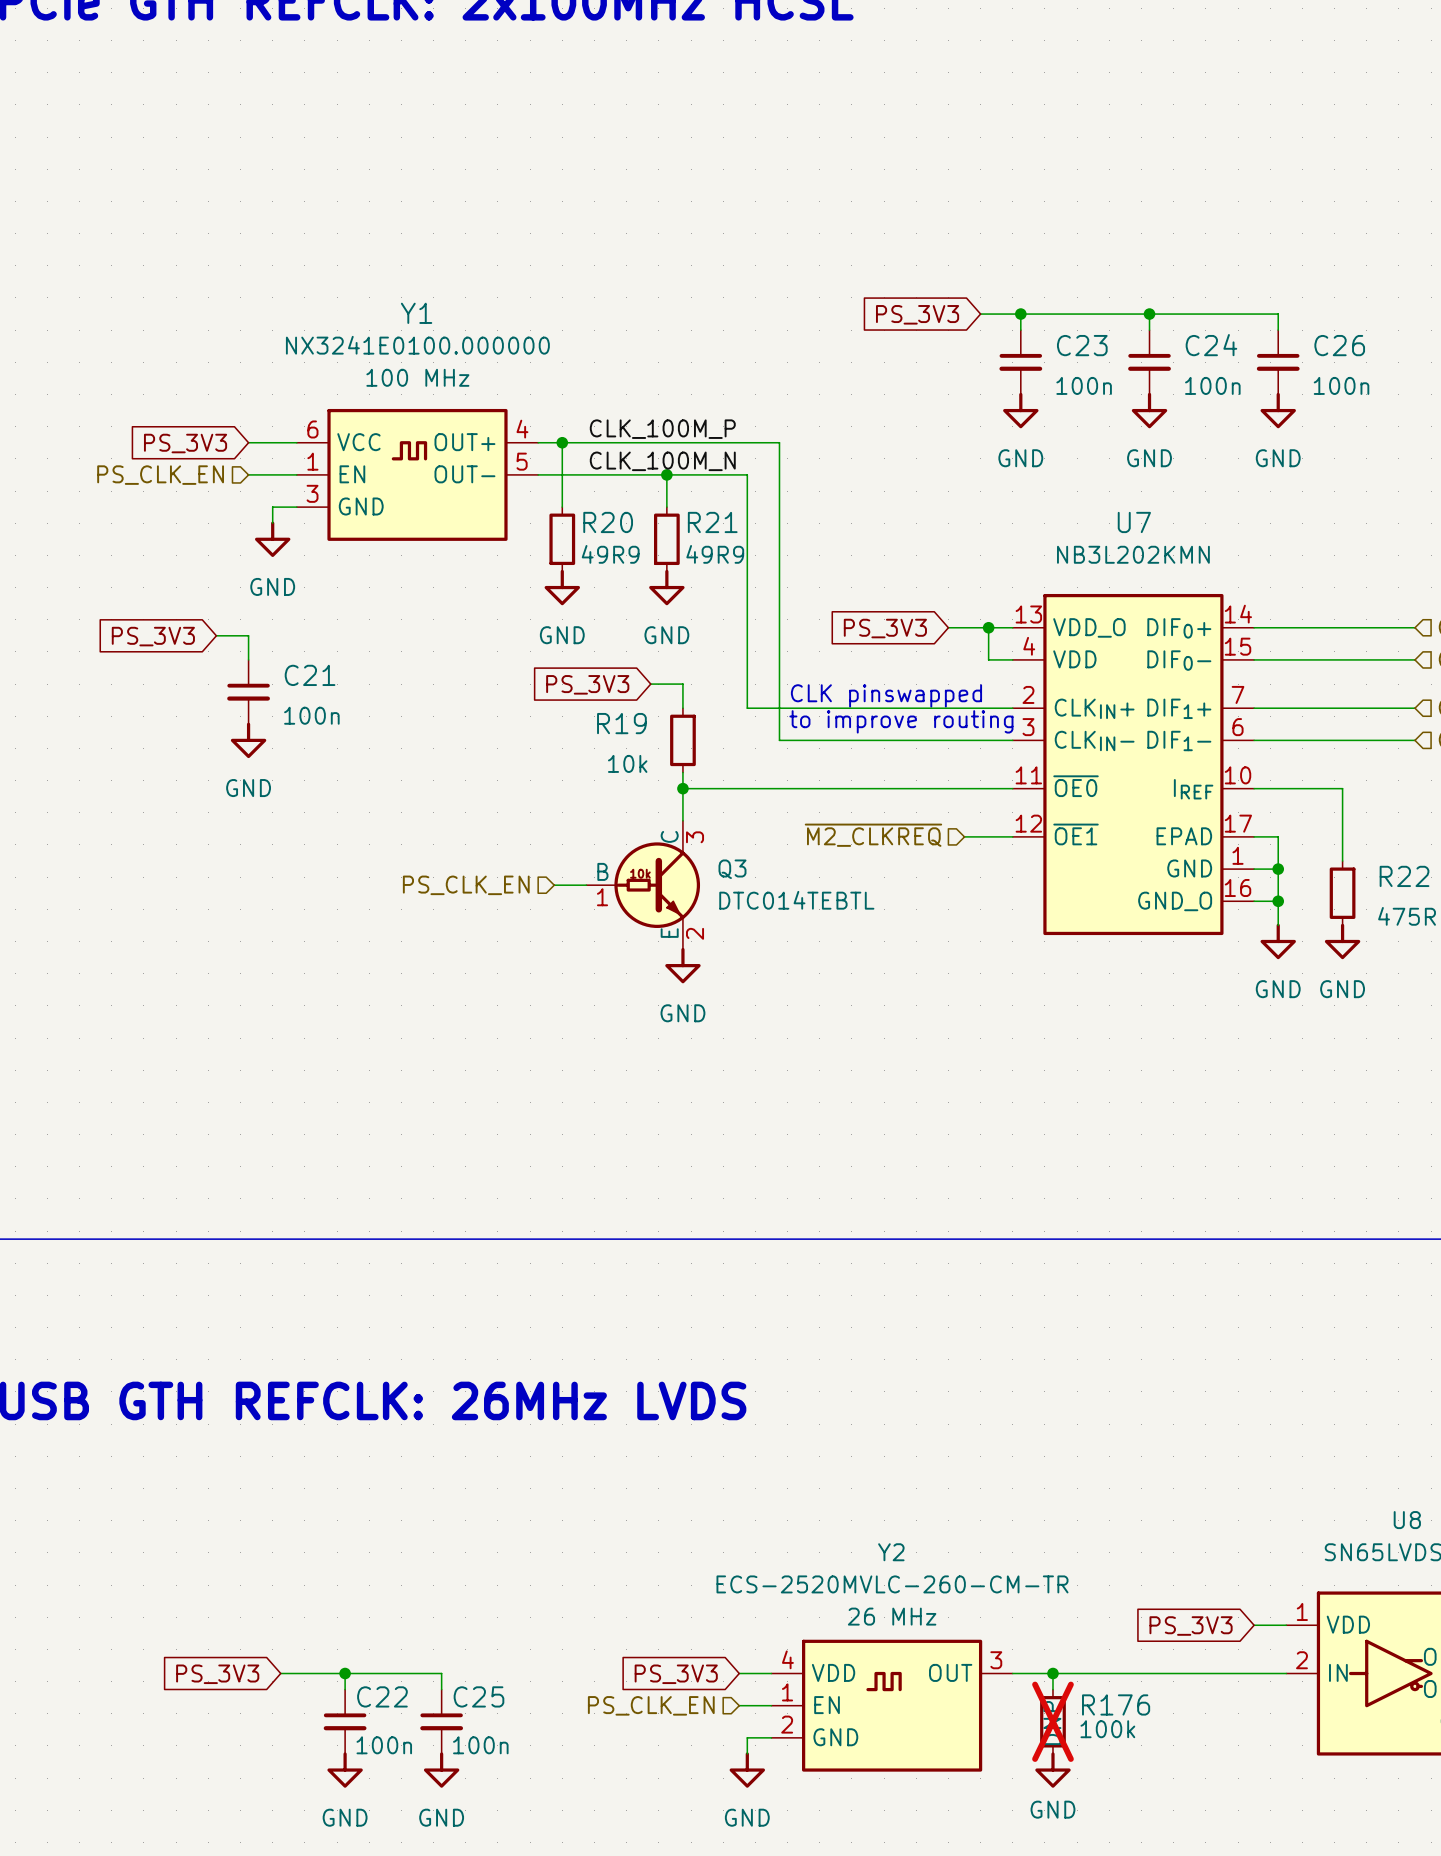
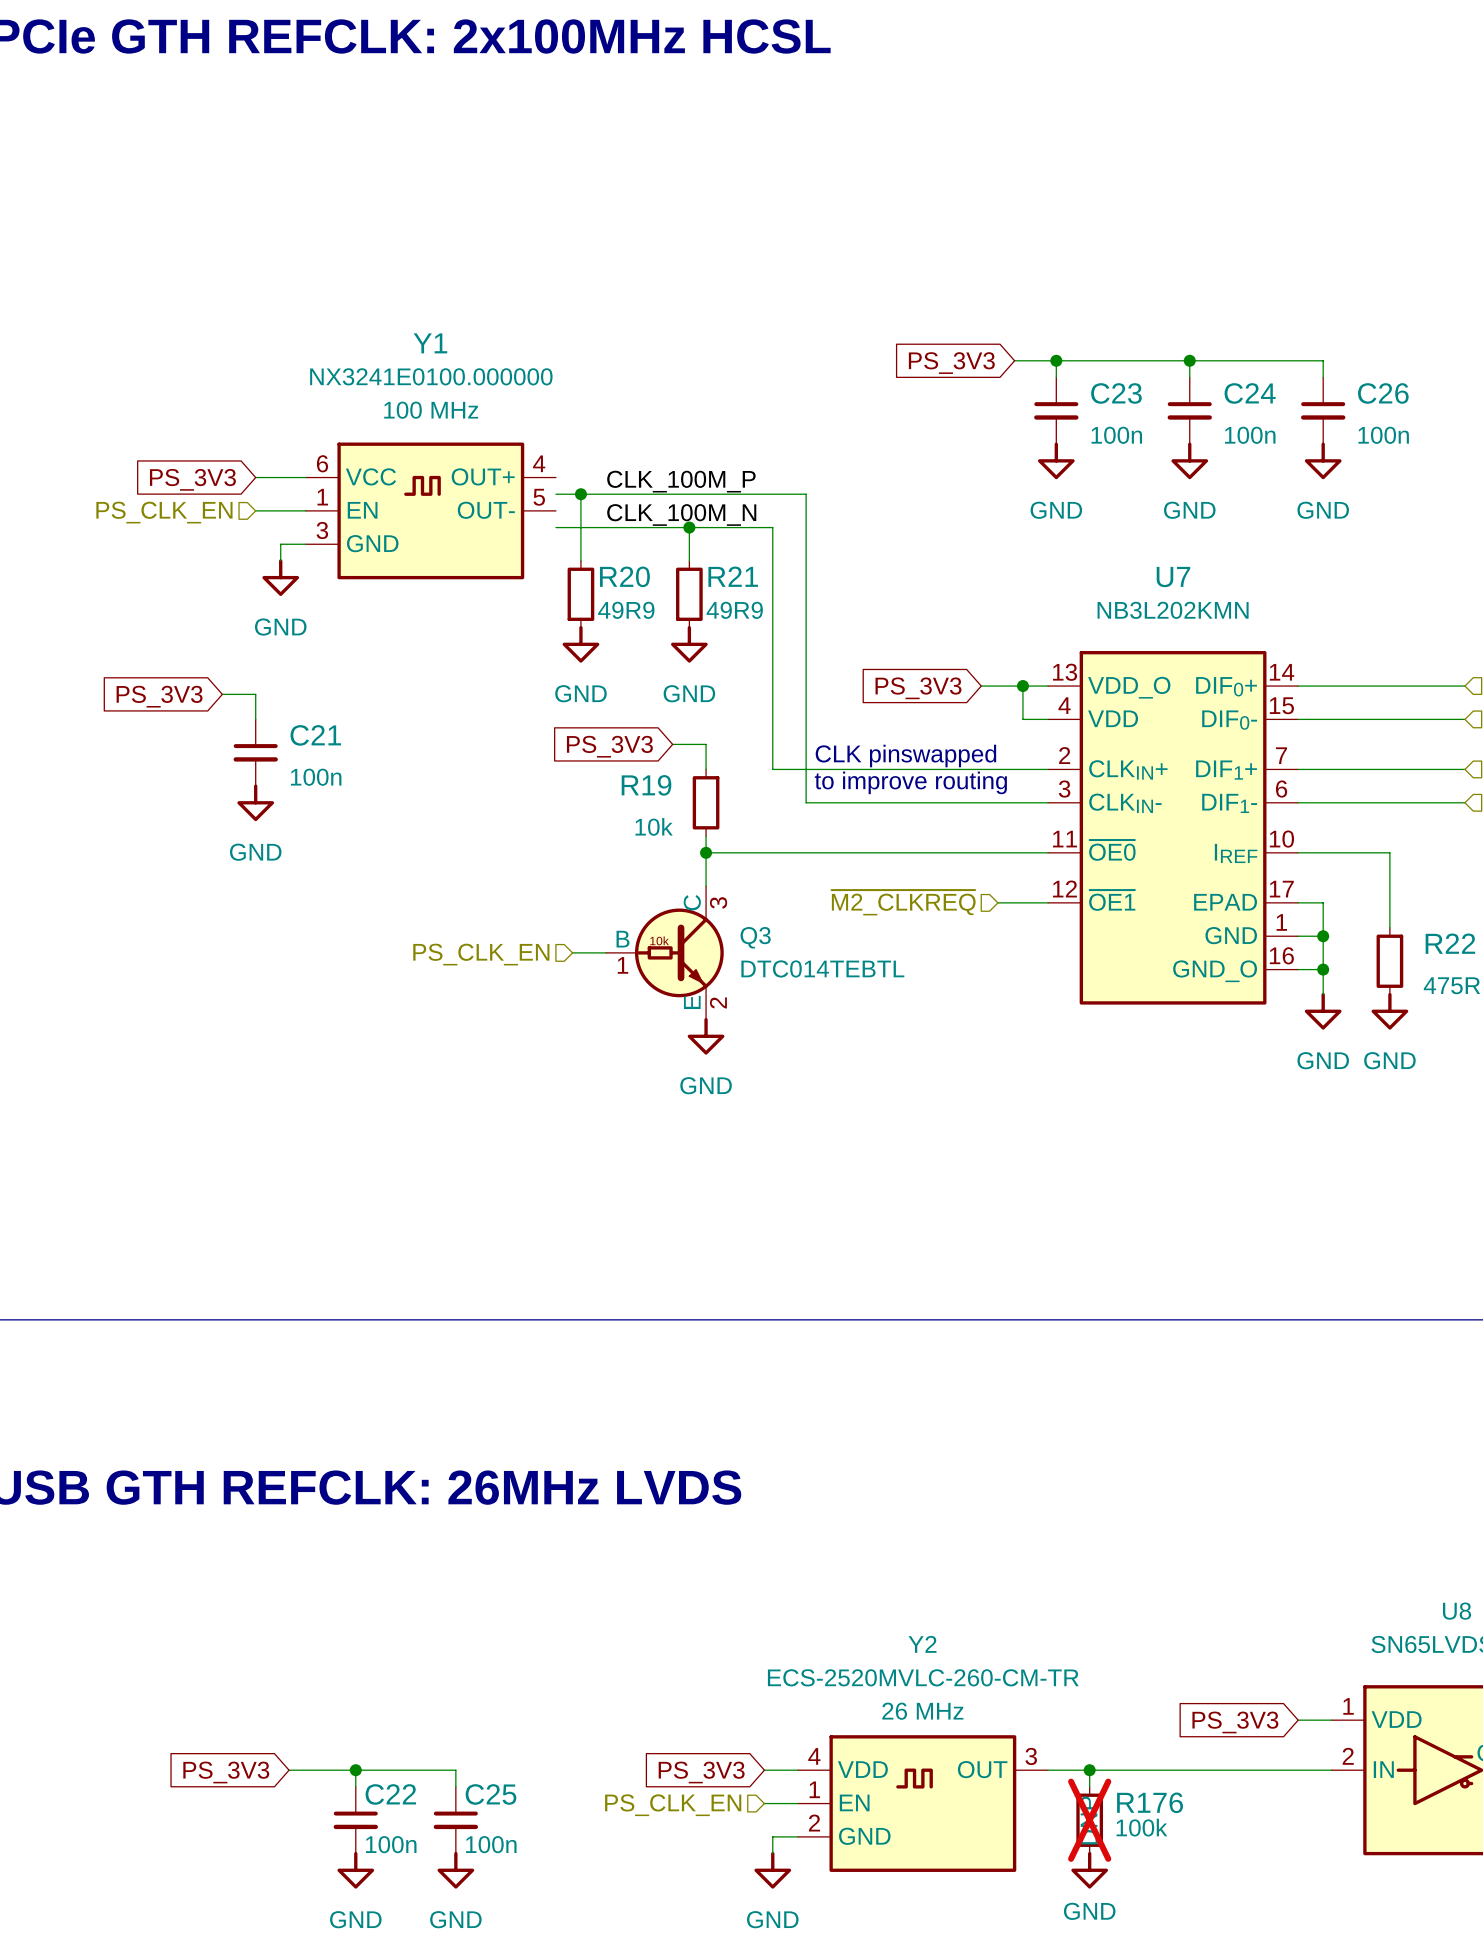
wire: (248, 442) (296, 442) -> (255, 477) (305, 477)
global label position: PS_3V3 (185, 443) -> PS_3V3 (192, 479)
wire: (248, 474) (296, 474) -> (255, 510) (305, 510)
Y1 position: (417, 474) -> (430, 510)
hierarchical label position: PS_CLK_EN (160, 475) -> PS_CLK_EN (164, 512)
wire: (296, 507) (272, 507) (272, 523) -> (305, 544) (280, 544) (280, 560)
power symbol position: GND (272, 539) -> GND (280, 577)

